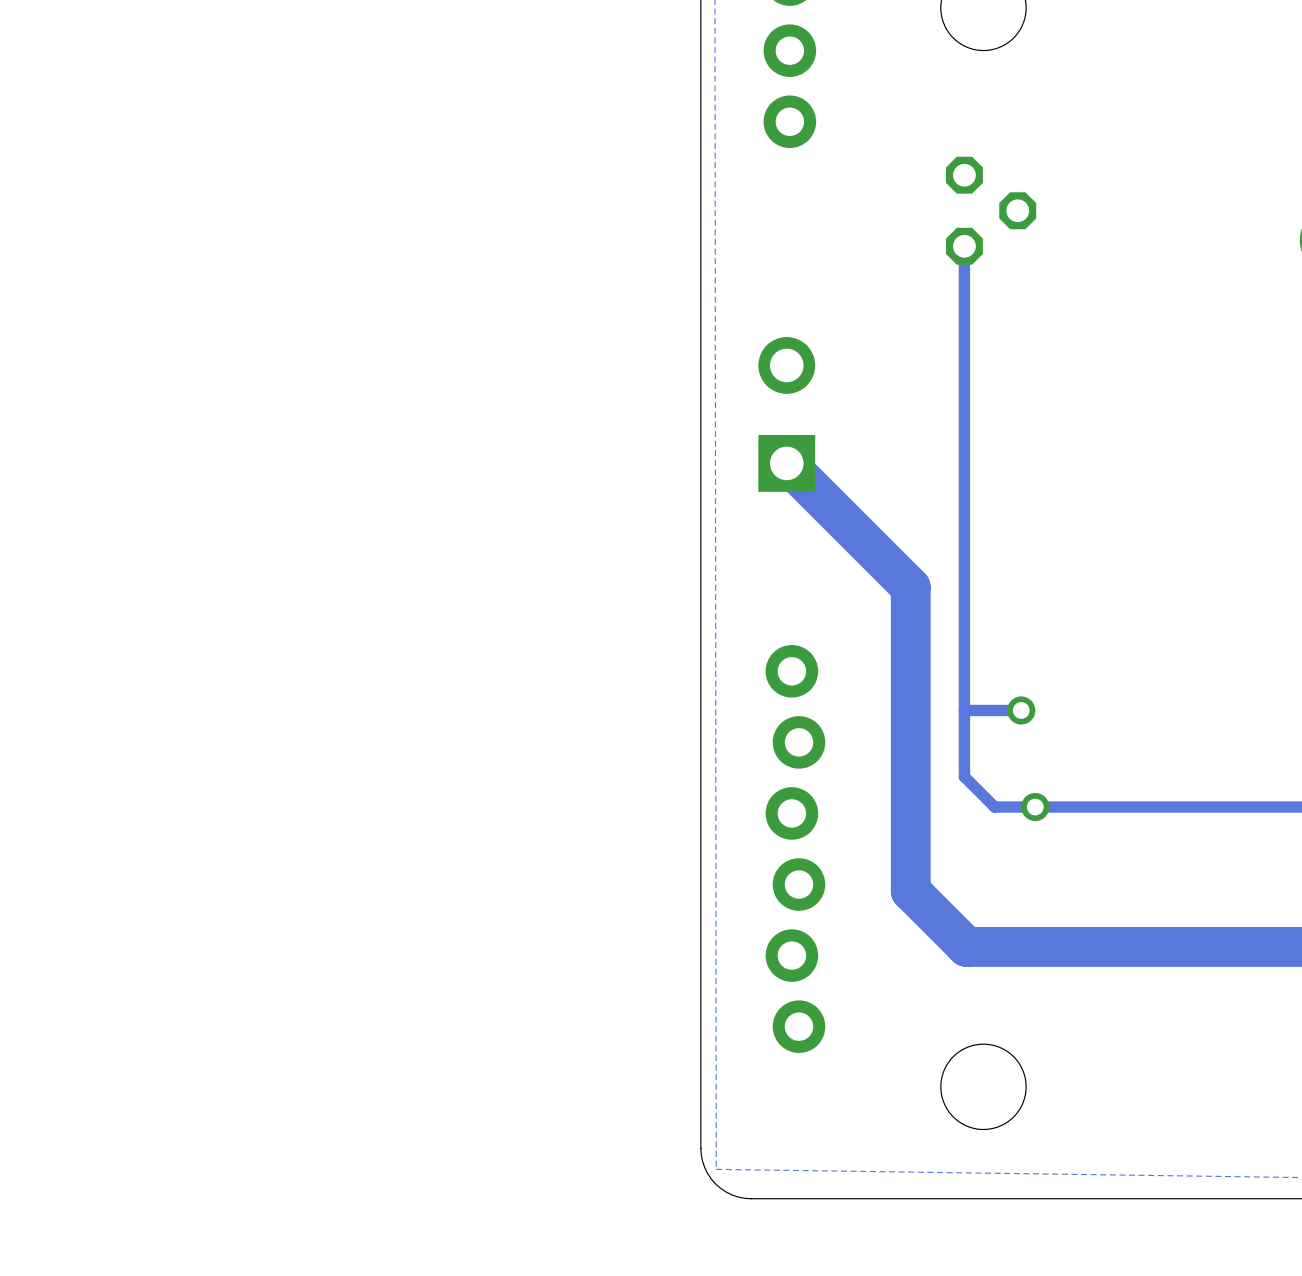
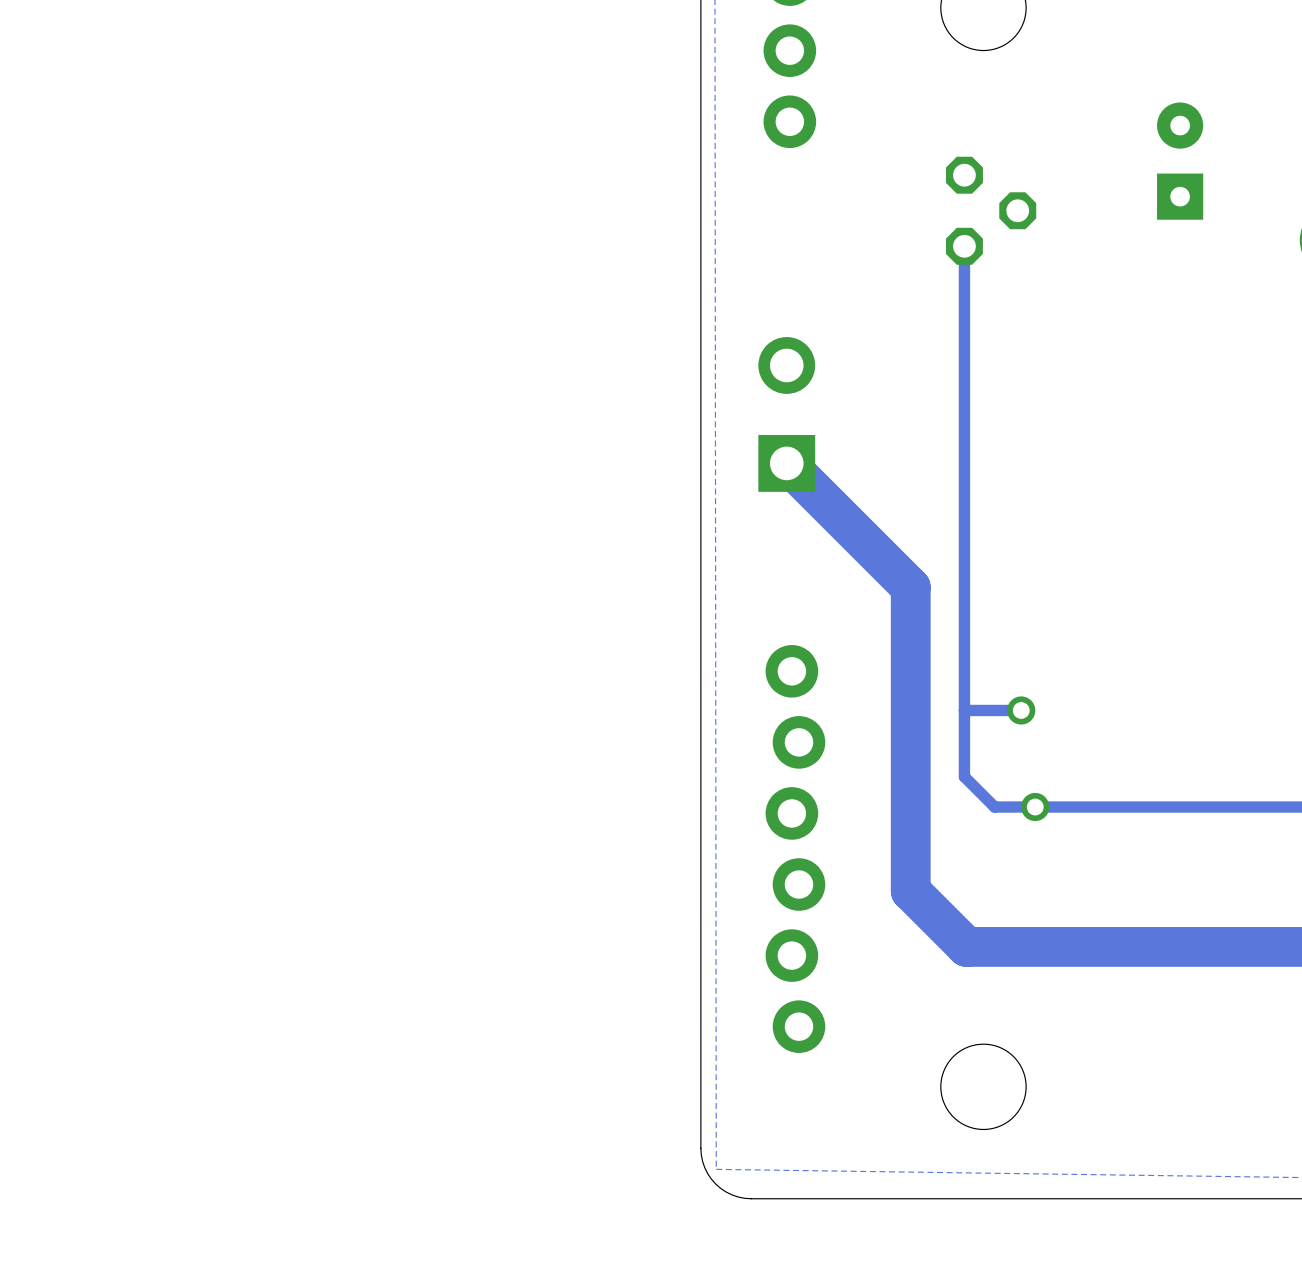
part: none -> (1180, 161)

